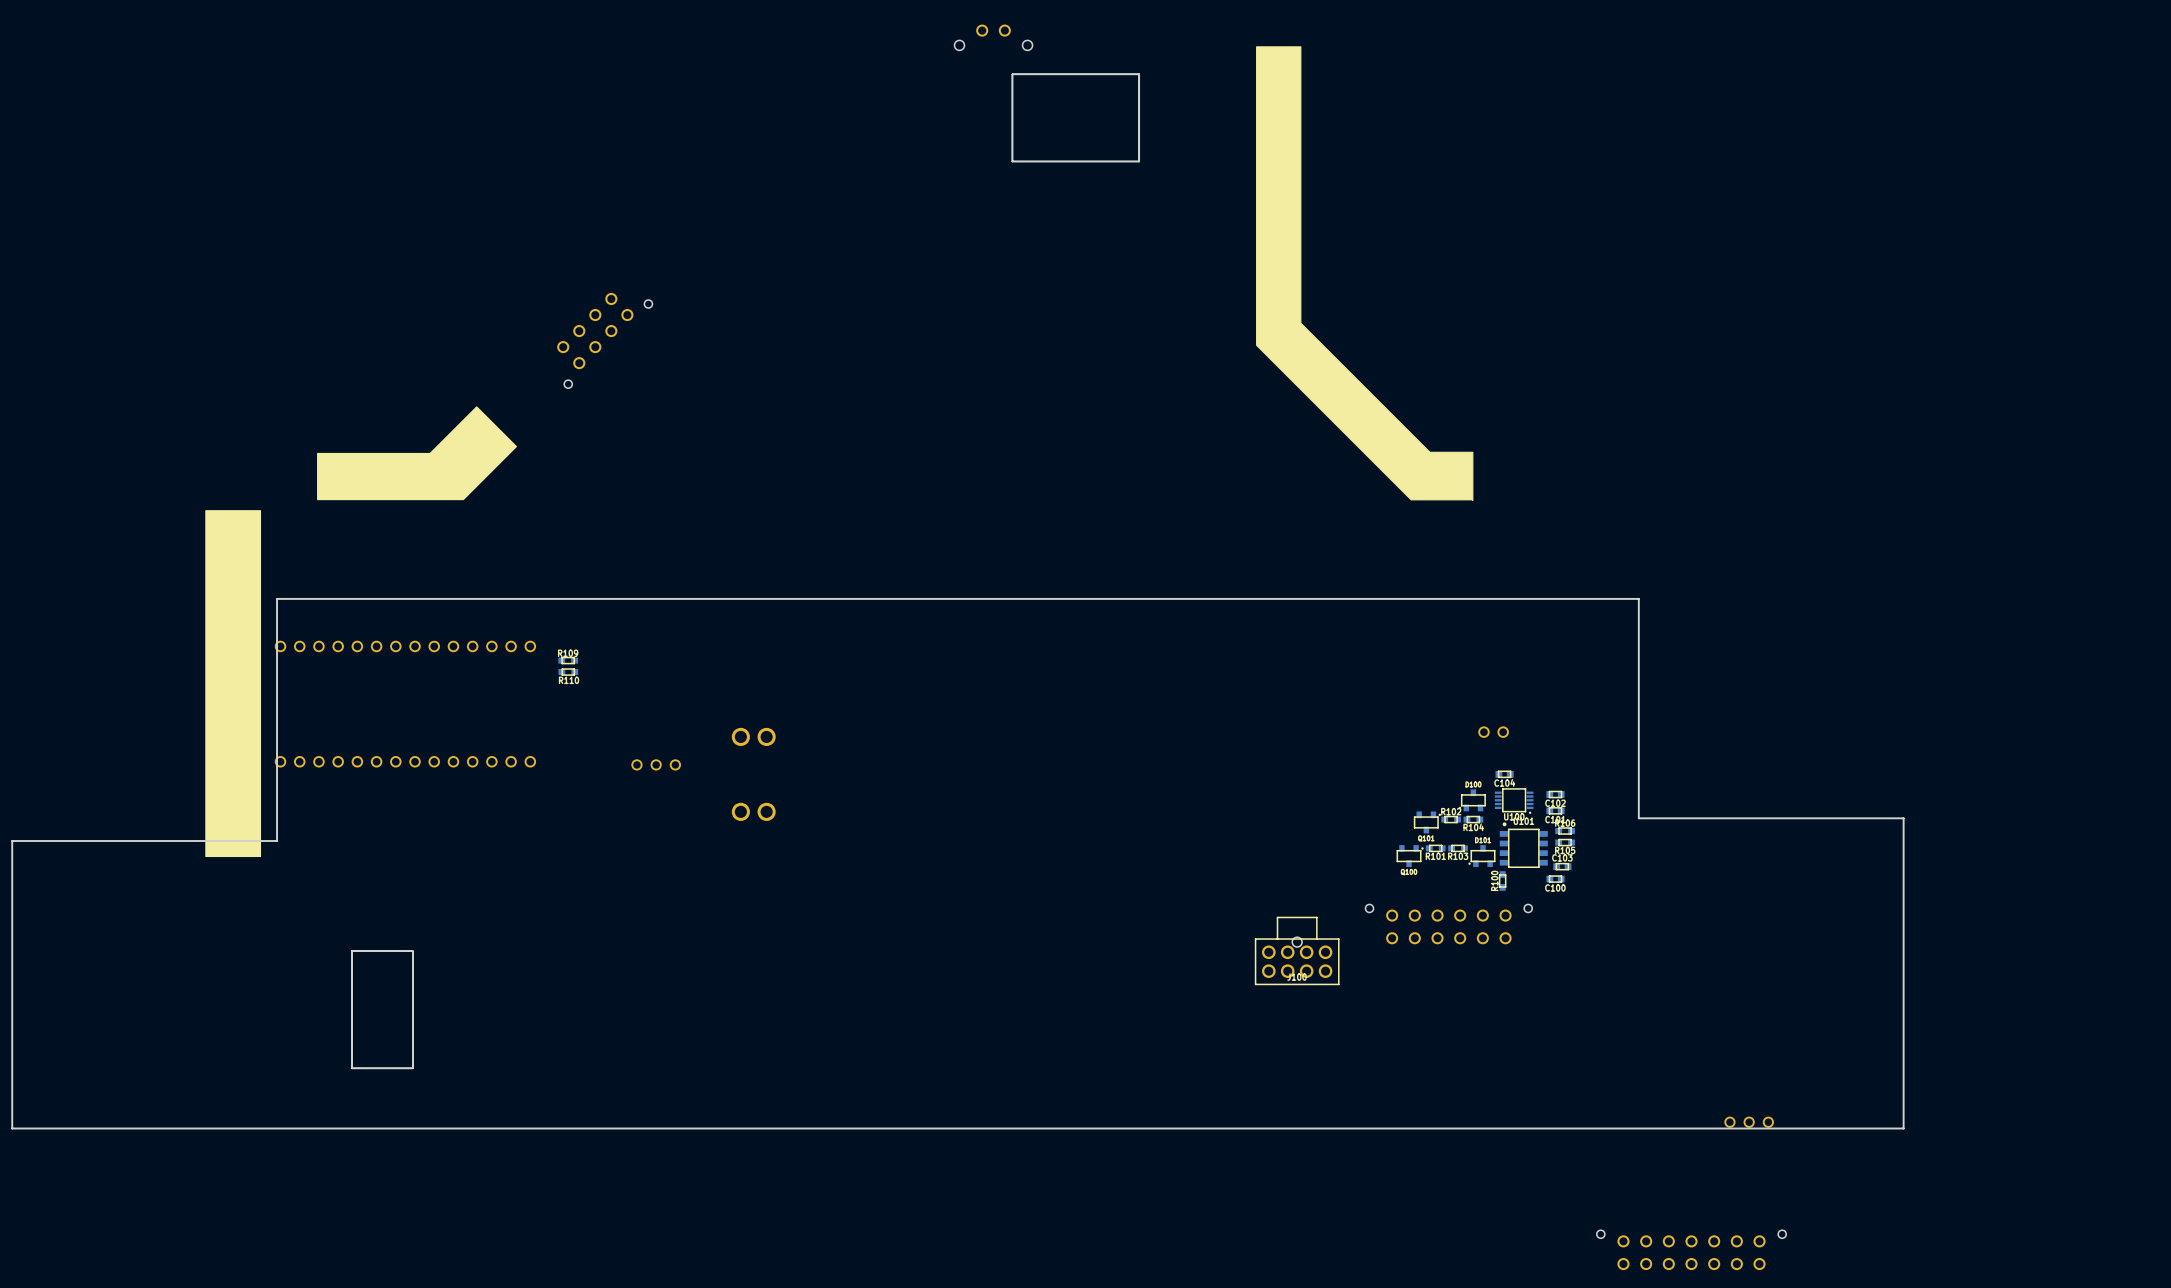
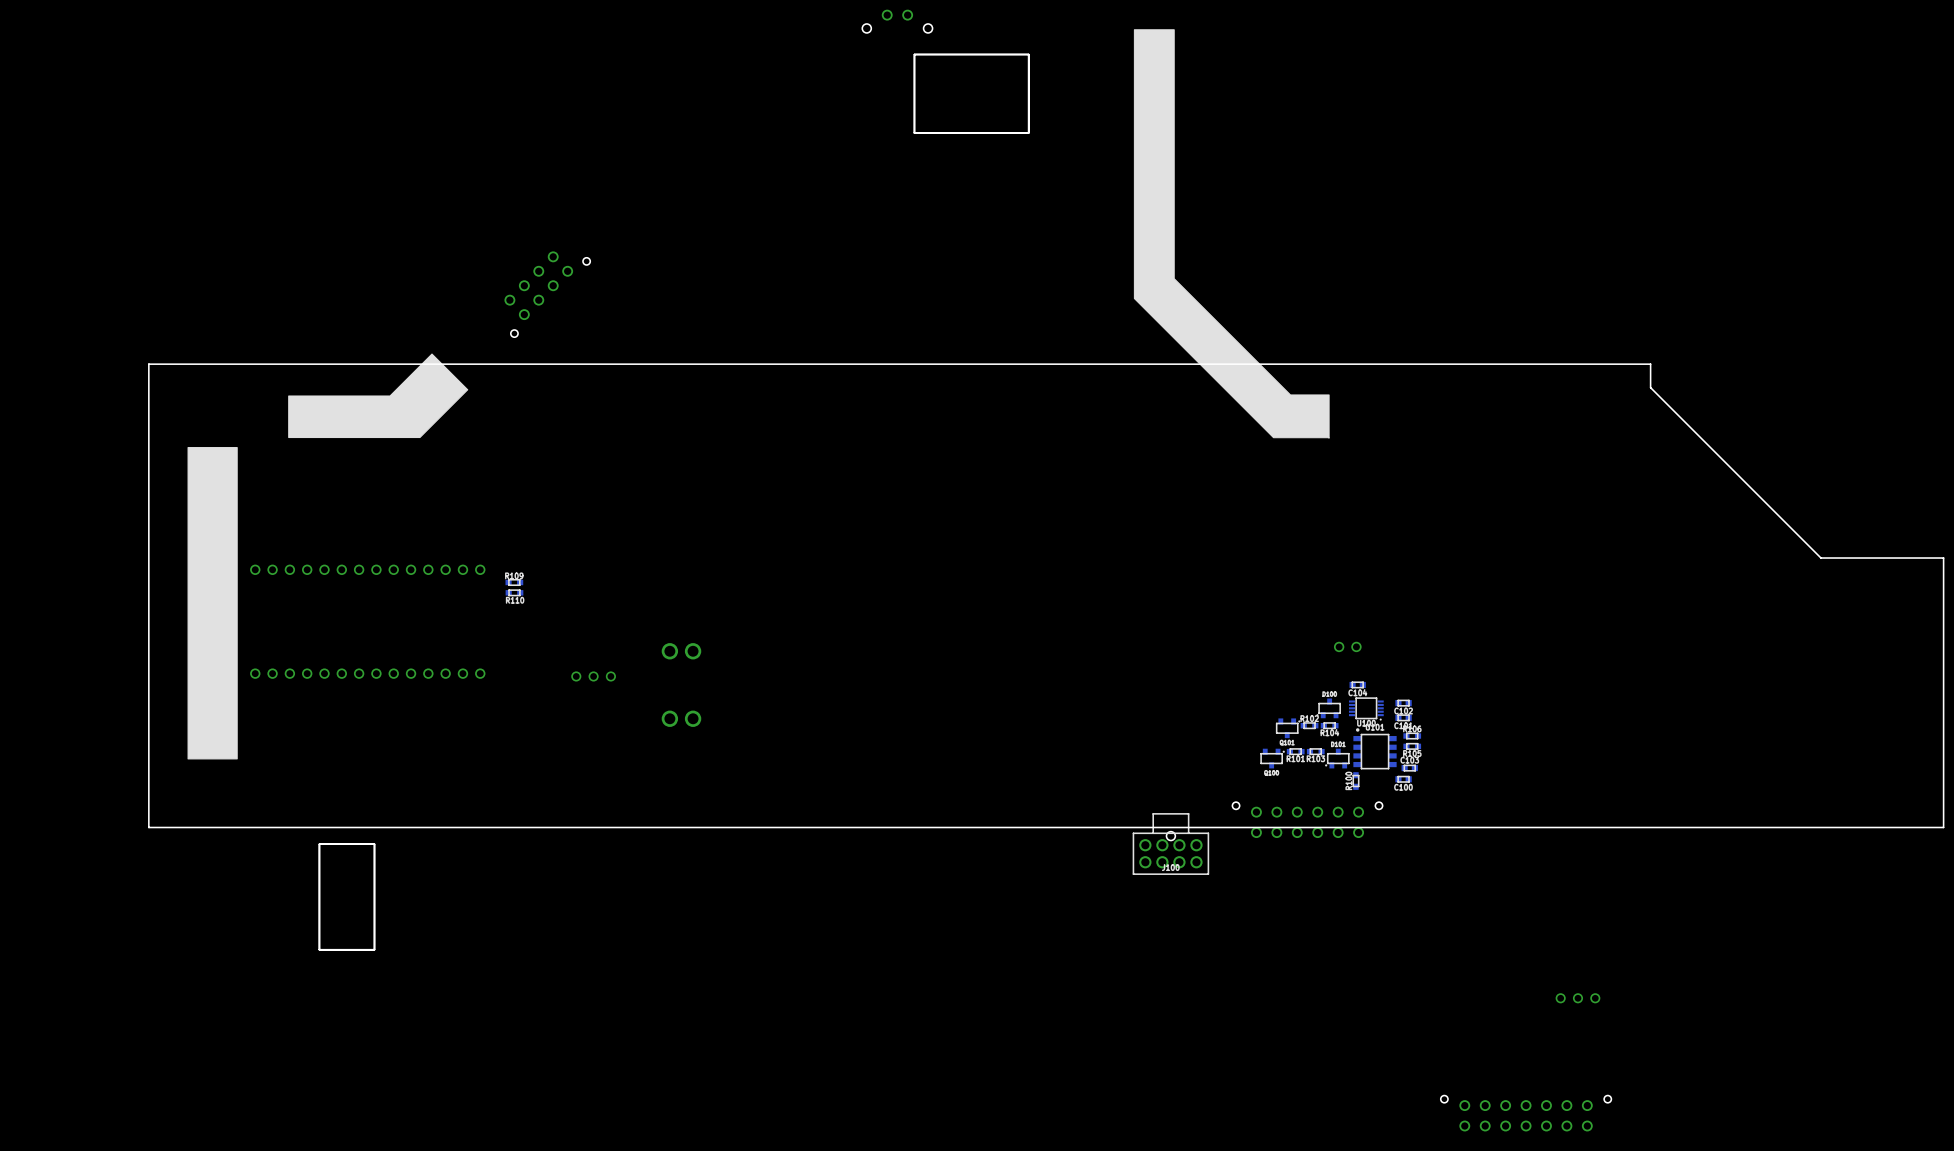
board edge: none -> (1650, 364) (148, 364) (148, 827) (1943, 827) (1943, 558) (1820, 558) (1650, 387) (1650, 364)
board edge: (1638, 598) (277, 598) (277, 841) (12, 841) (12, 1128) (1903, 1128) (1903, 818) (1638, 818) (1638, 598) -> none

